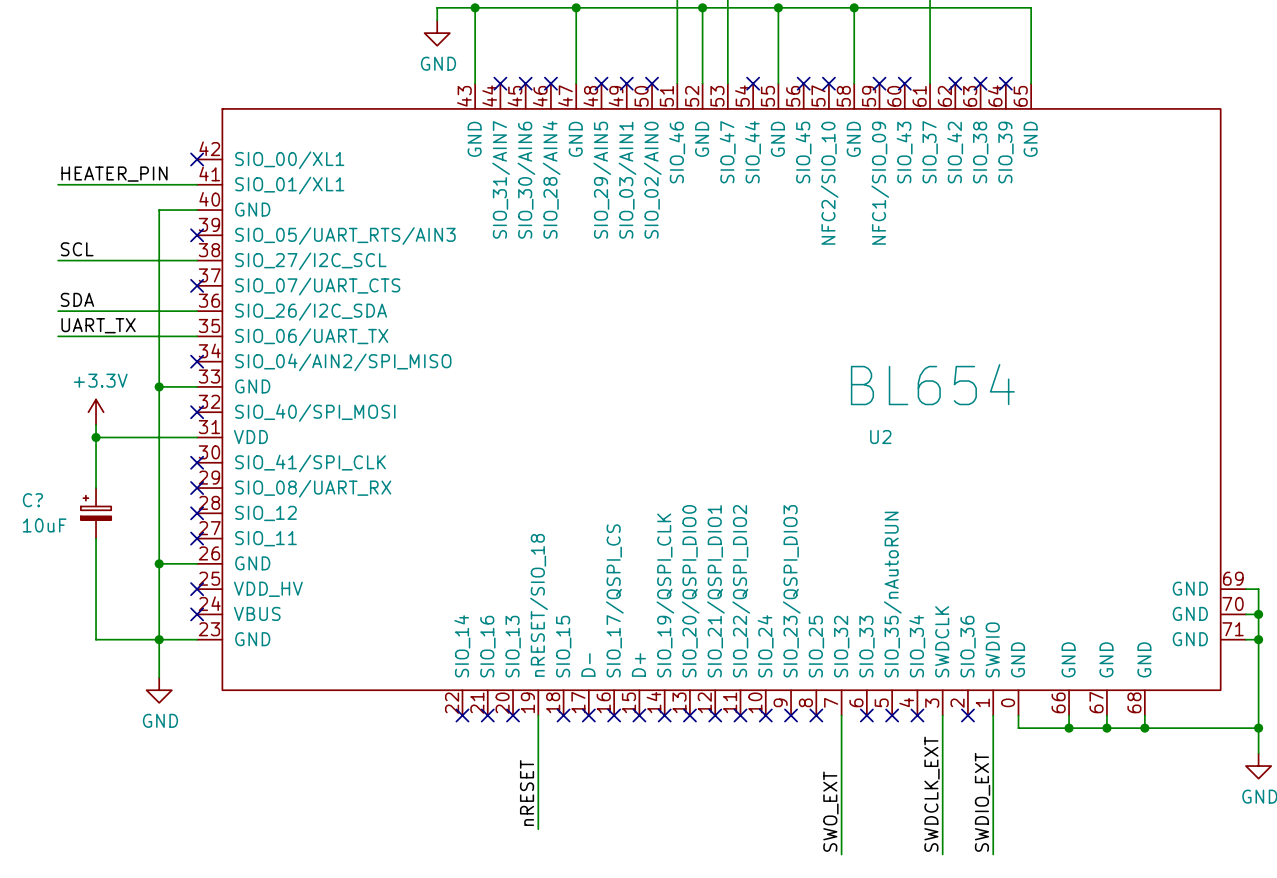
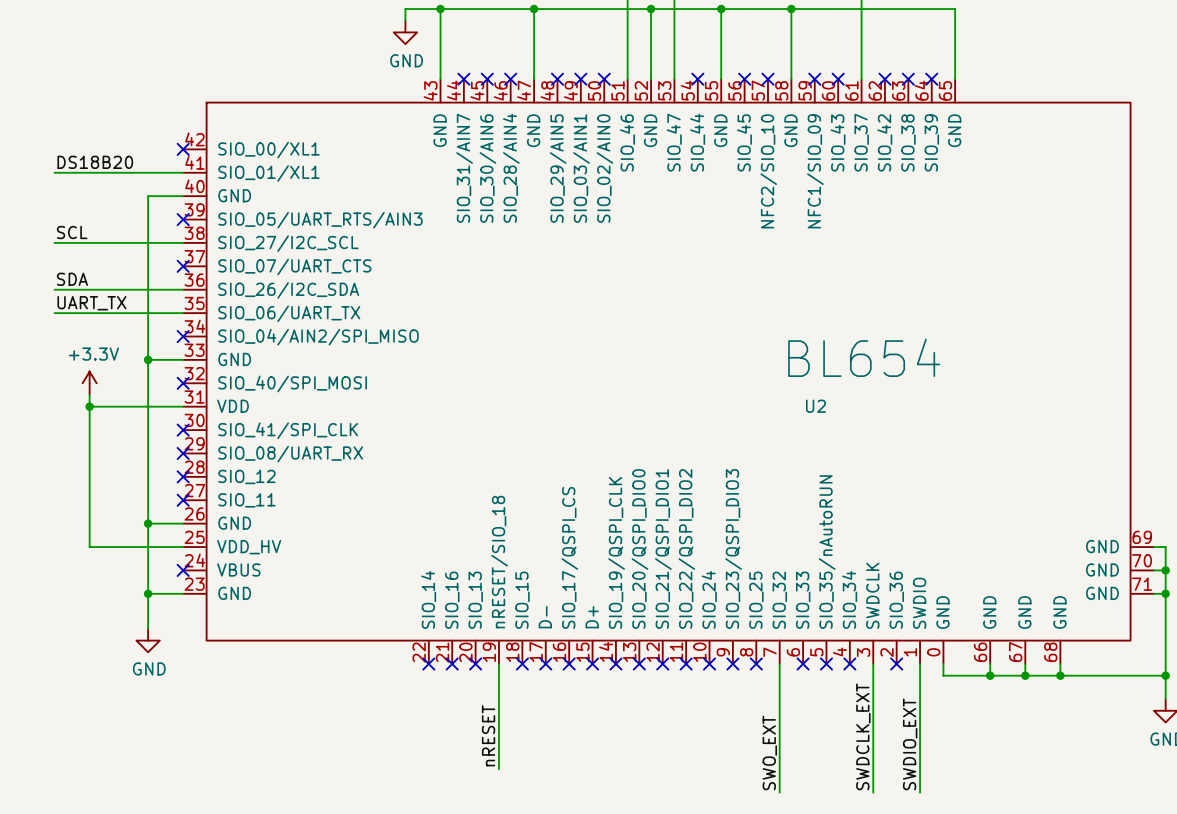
label: HEATER_PIN (114, 174) -> DS18B20 (95, 162)
C?: 10uF (96, 513) -> none
wire: (96, 589) (96, 639) (159, 639) -> (89, 547) (183, 547)
no-connect mark: (197, 589) -> none

